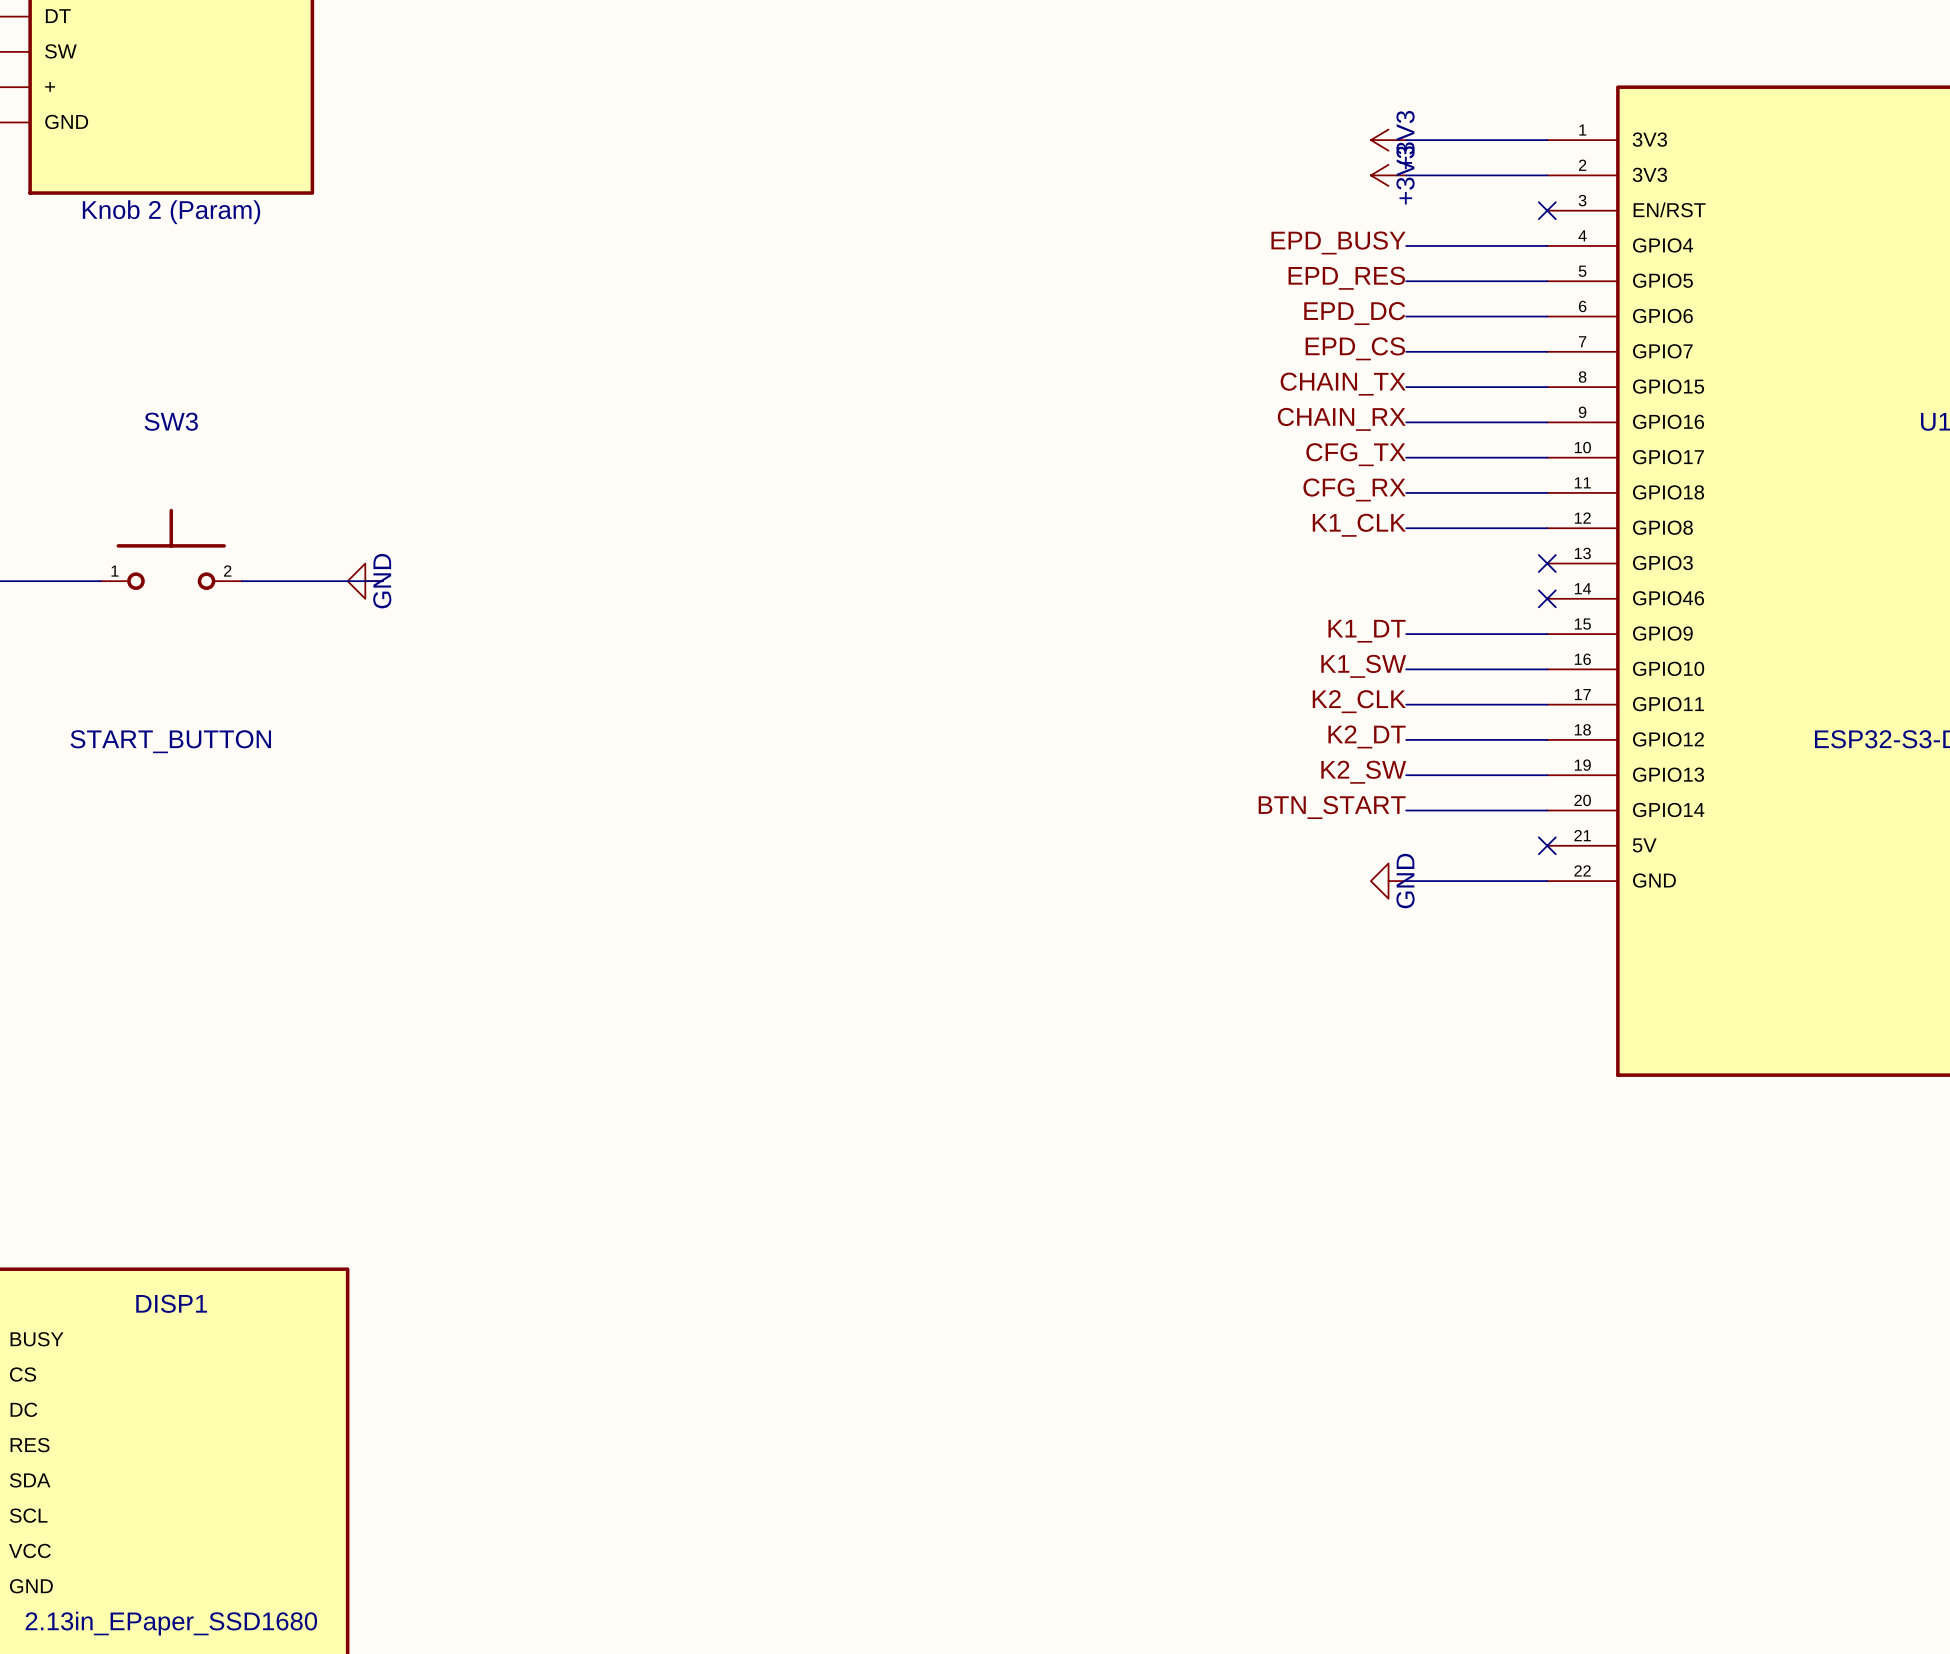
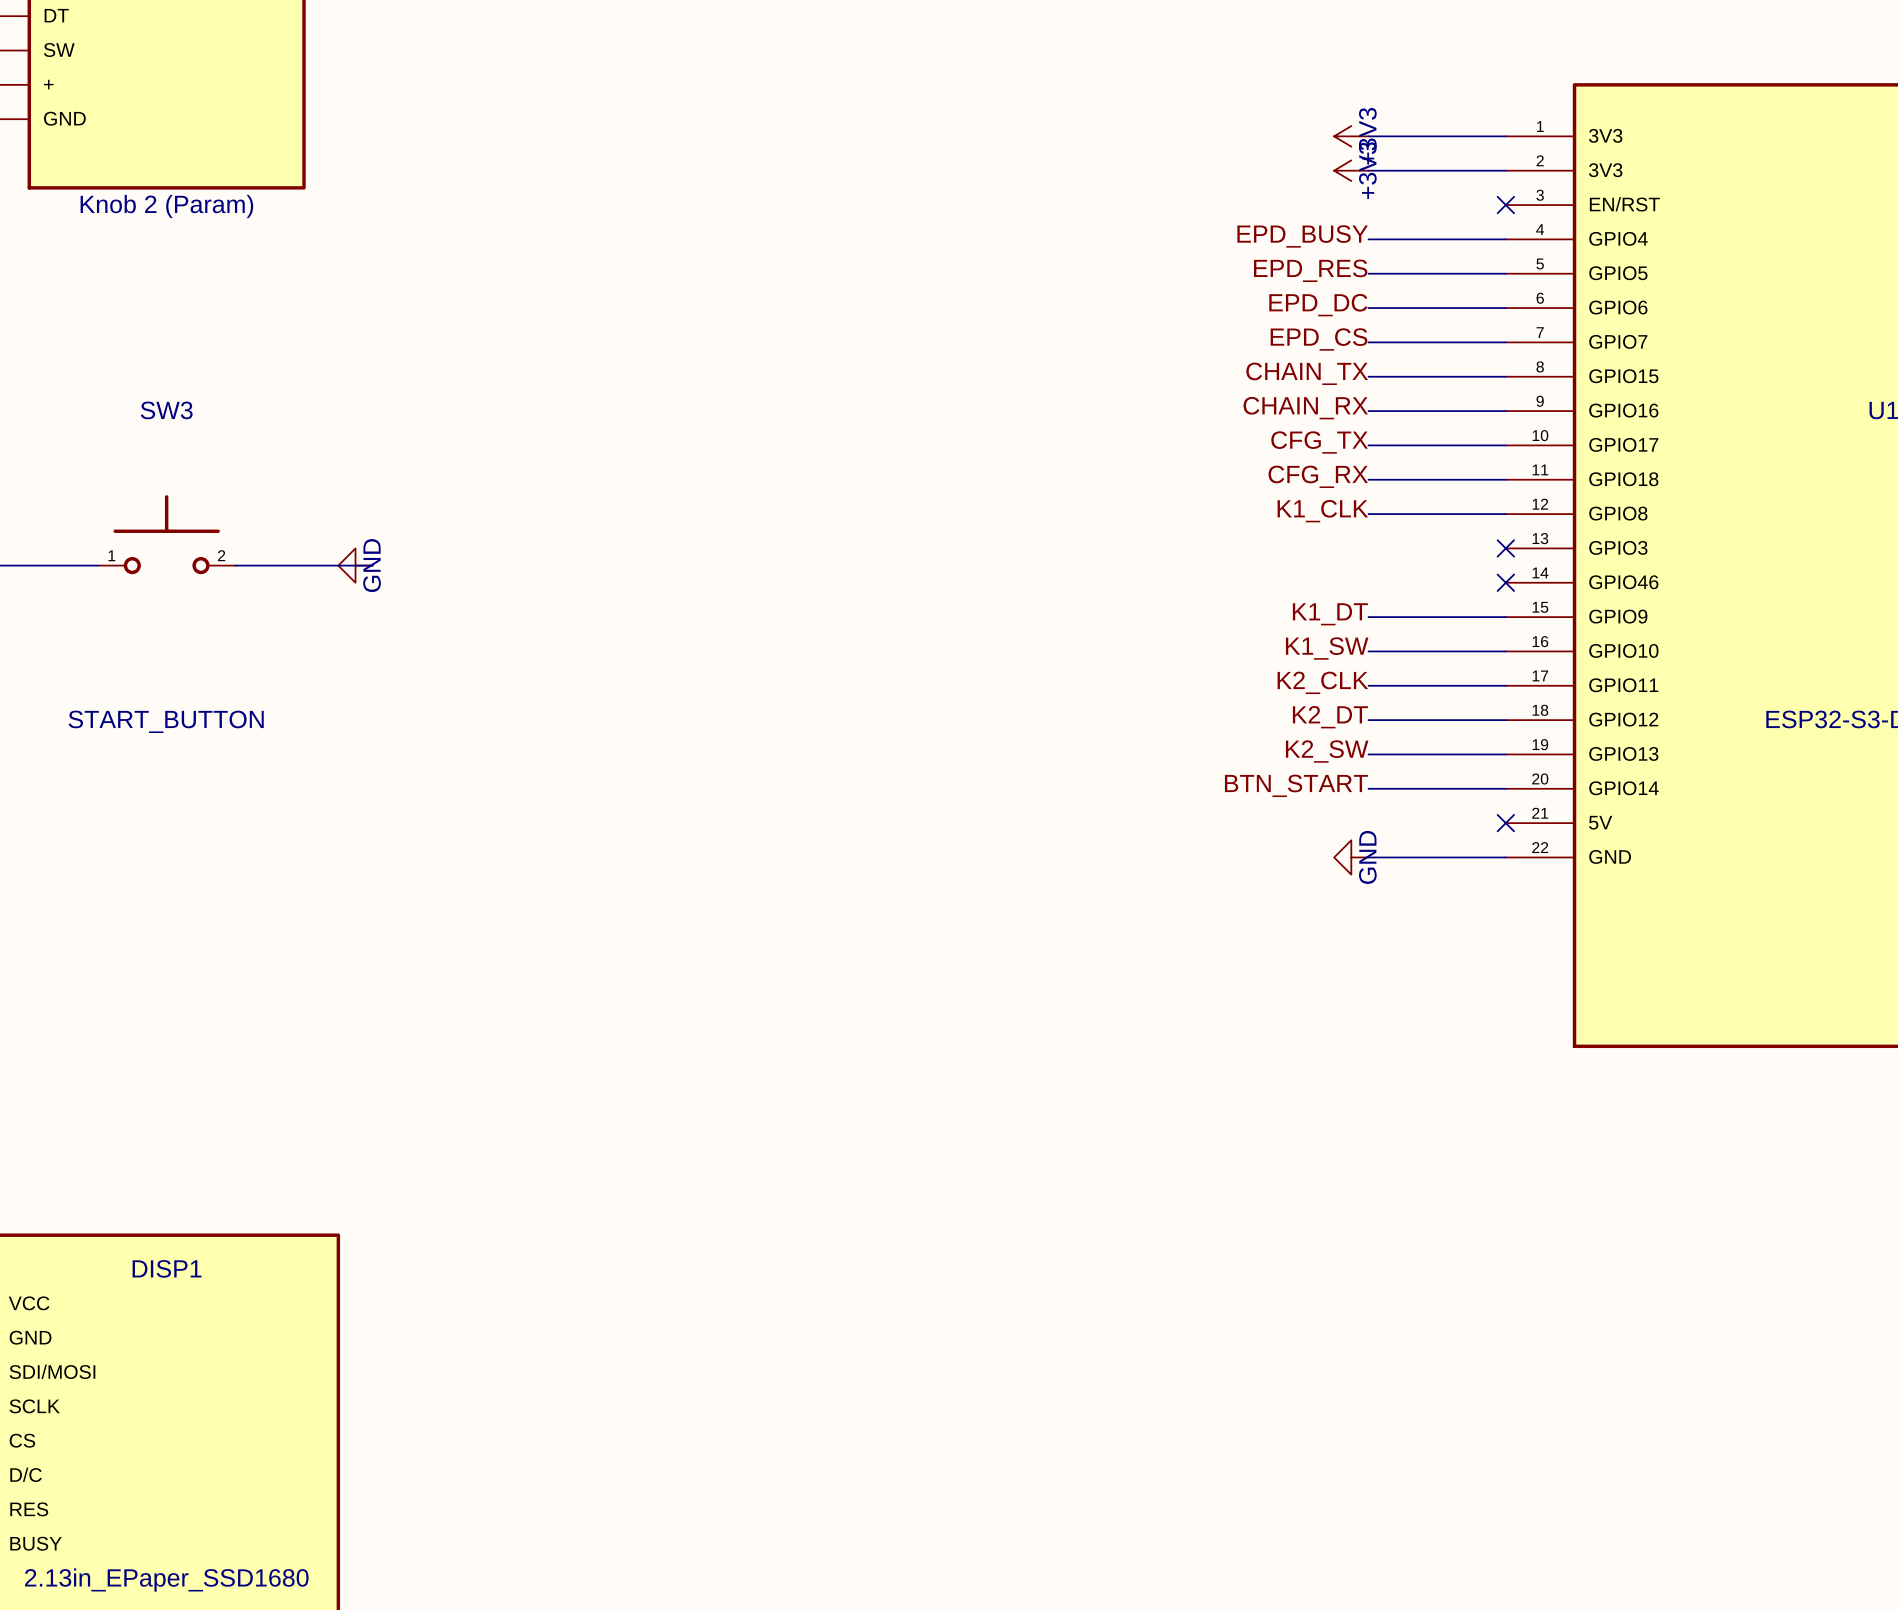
DISP1 pin name: BUSY (37, 1339) -> VCC (29, 1303)
DISP1 pin name: CS (23, 1374) -> GND (30, 1337)
DISP1 pin name: DC (23, 1409) -> SDI/MOSI (52, 1371)
DISP1 pin name: RES (30, 1445) -> SCLK (34, 1406)
DISP1 pin name: SDA (30, 1480) -> CS (22, 1440)
DISP1 pin name: SCL (28, 1515) -> D/C (26, 1474)
DISP1 pin name: VCC (29, 1550) -> RES (29, 1509)
DISP1 pin name: GND (31, 1586) -> BUSY (36, 1543)

